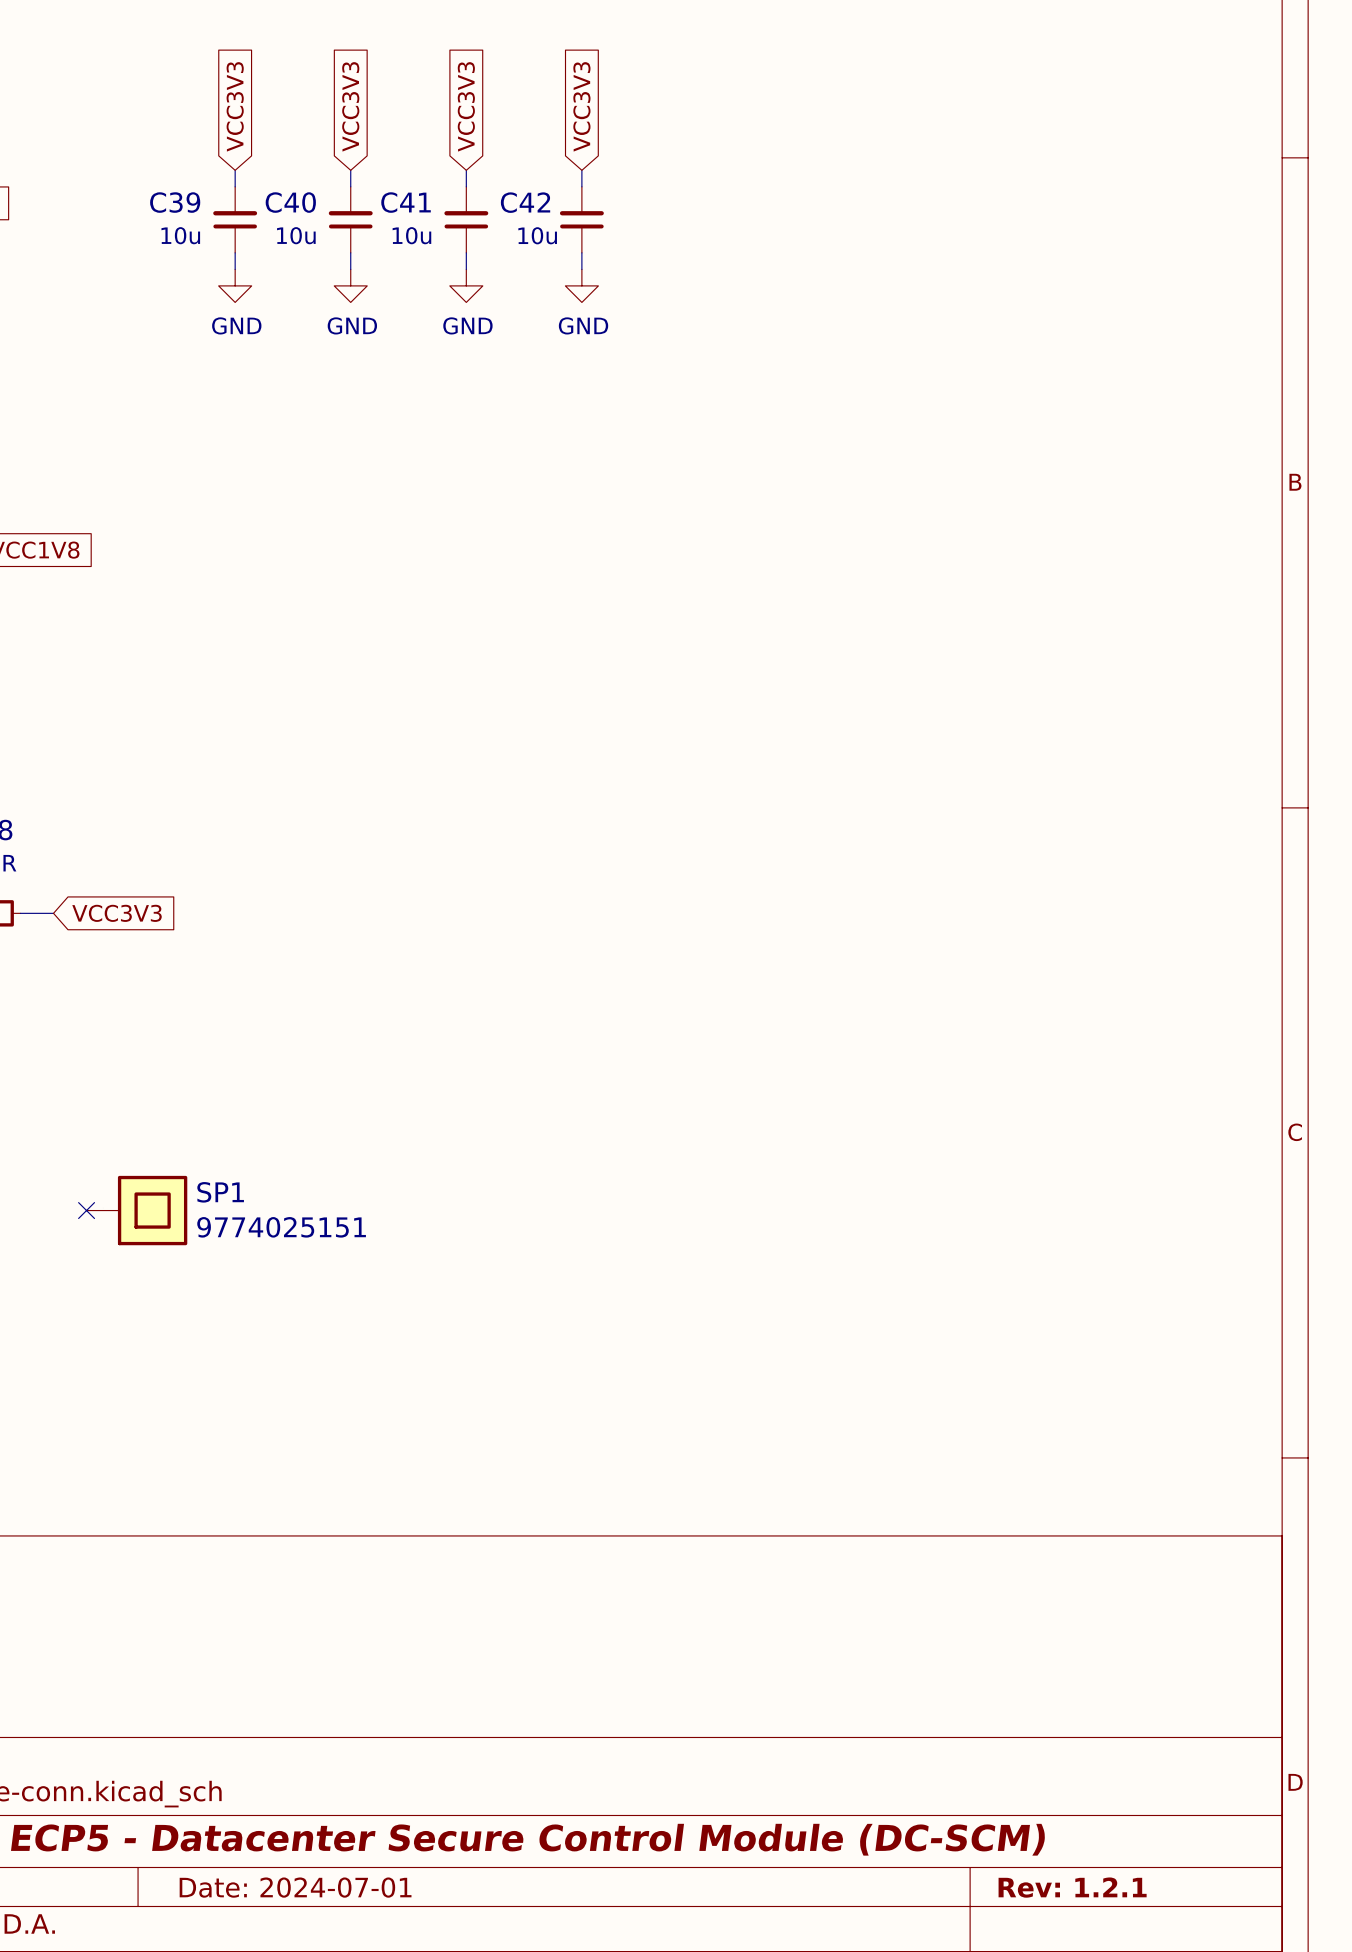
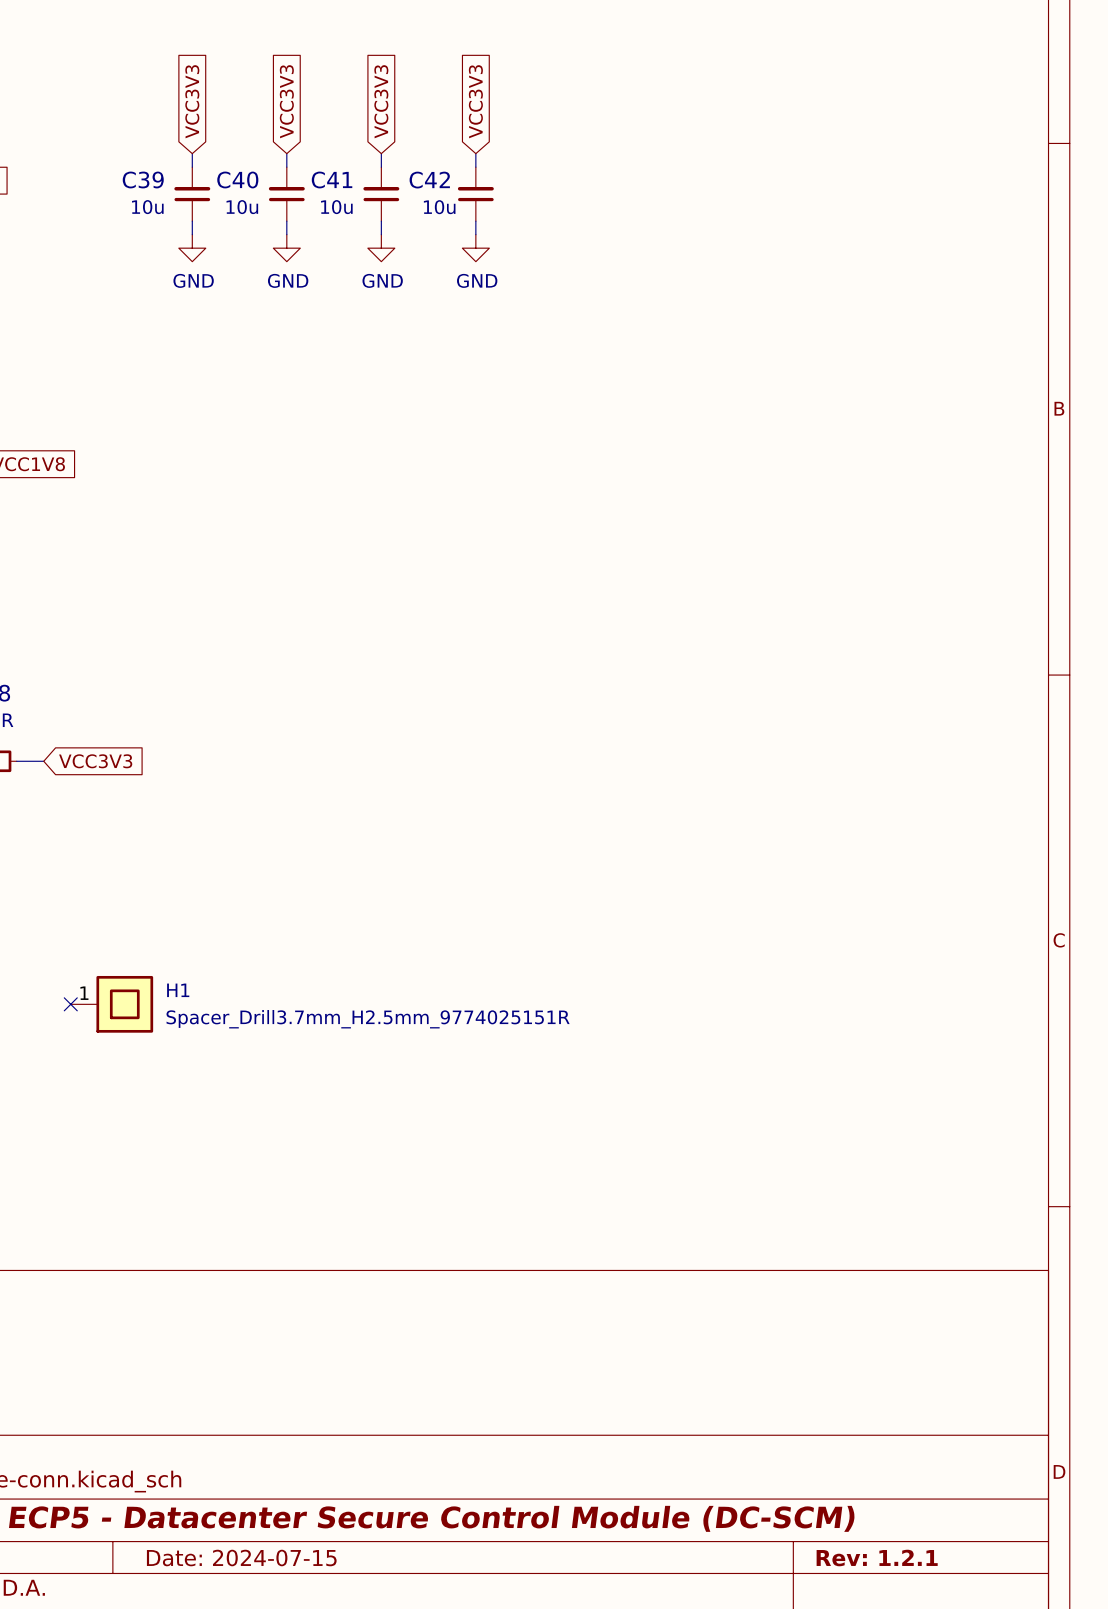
SP1 symbol: [86, 1175, 188, 1246] -> [70, 975, 154, 1033]
SP1 name: SP1 (220, 1192) -> H1 (178, 990)
SP1 value: 9774025151 (281, 1227) -> Spacer_Drill3.7mm_H2.5mm_9774025151R (368, 1019)
title block: Date: 2024-07-01 (295, 1887) -> Date: 2024-07-15 (241, 1558)

